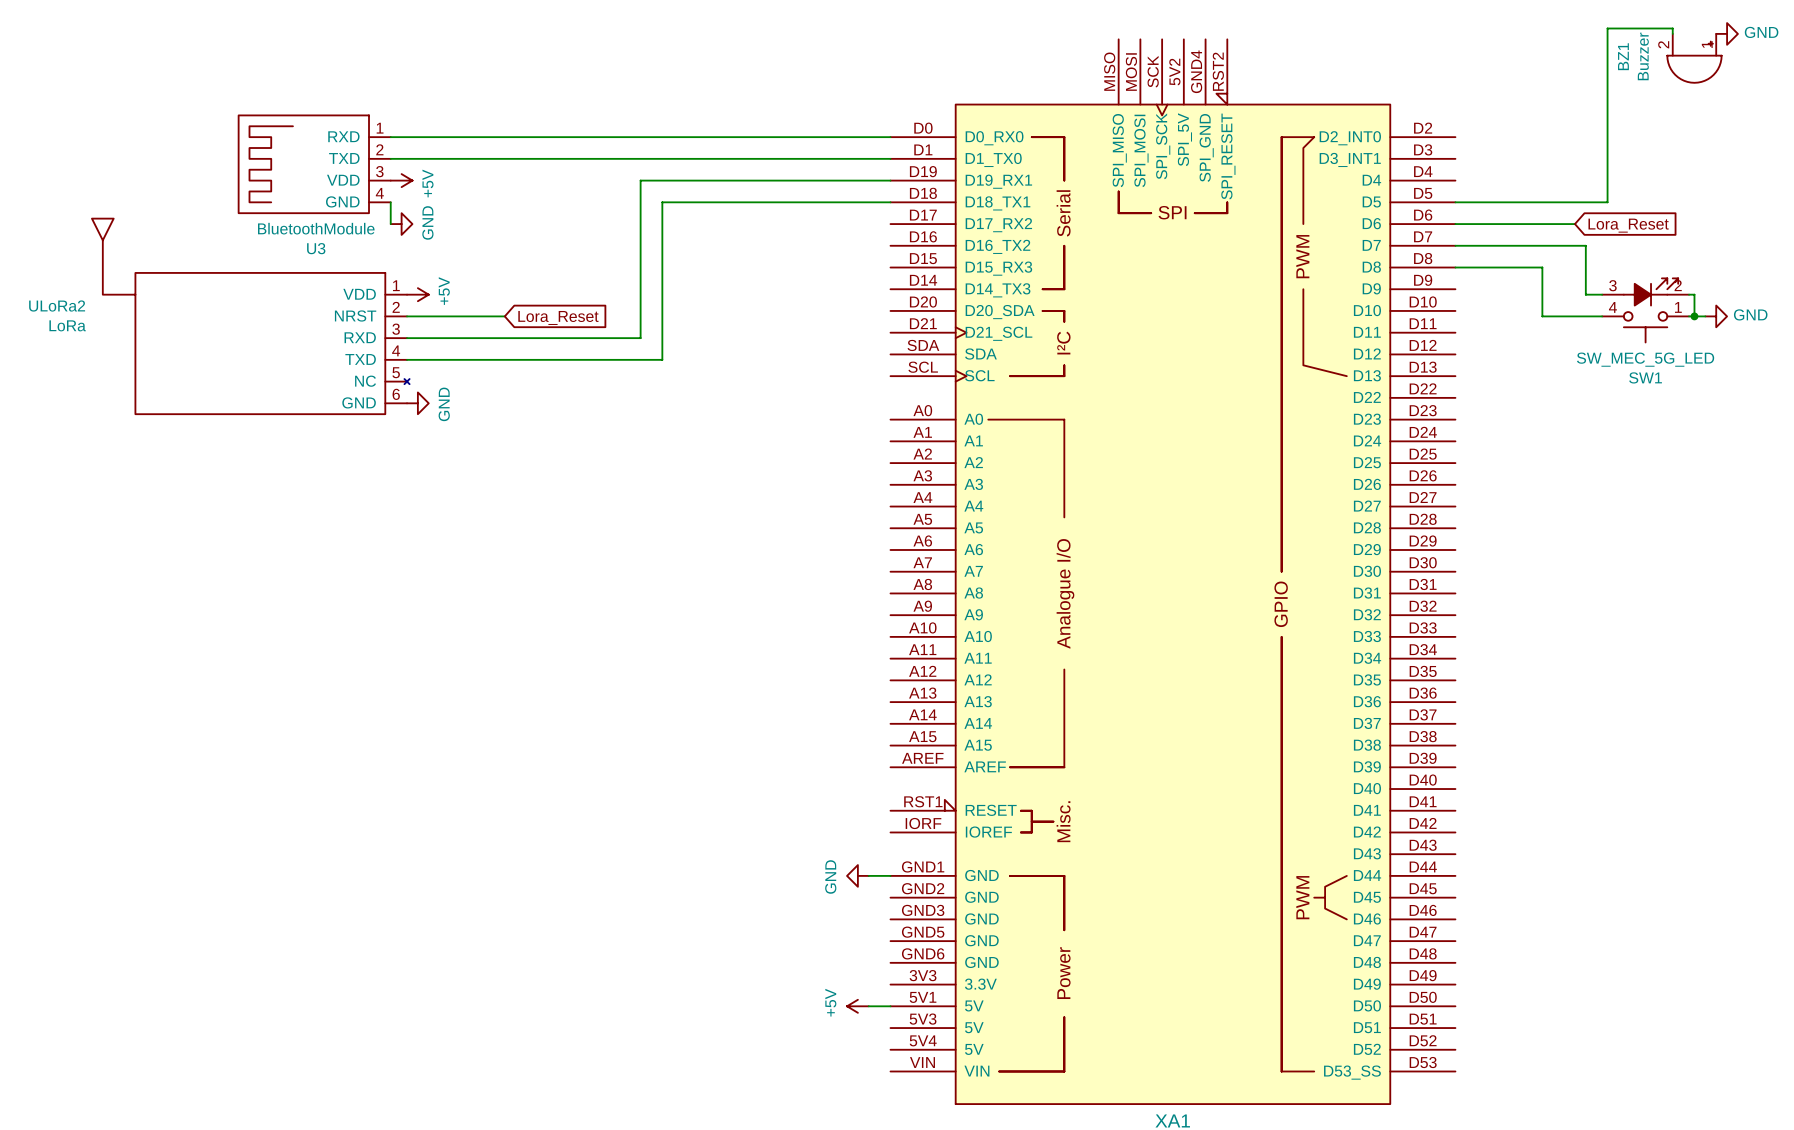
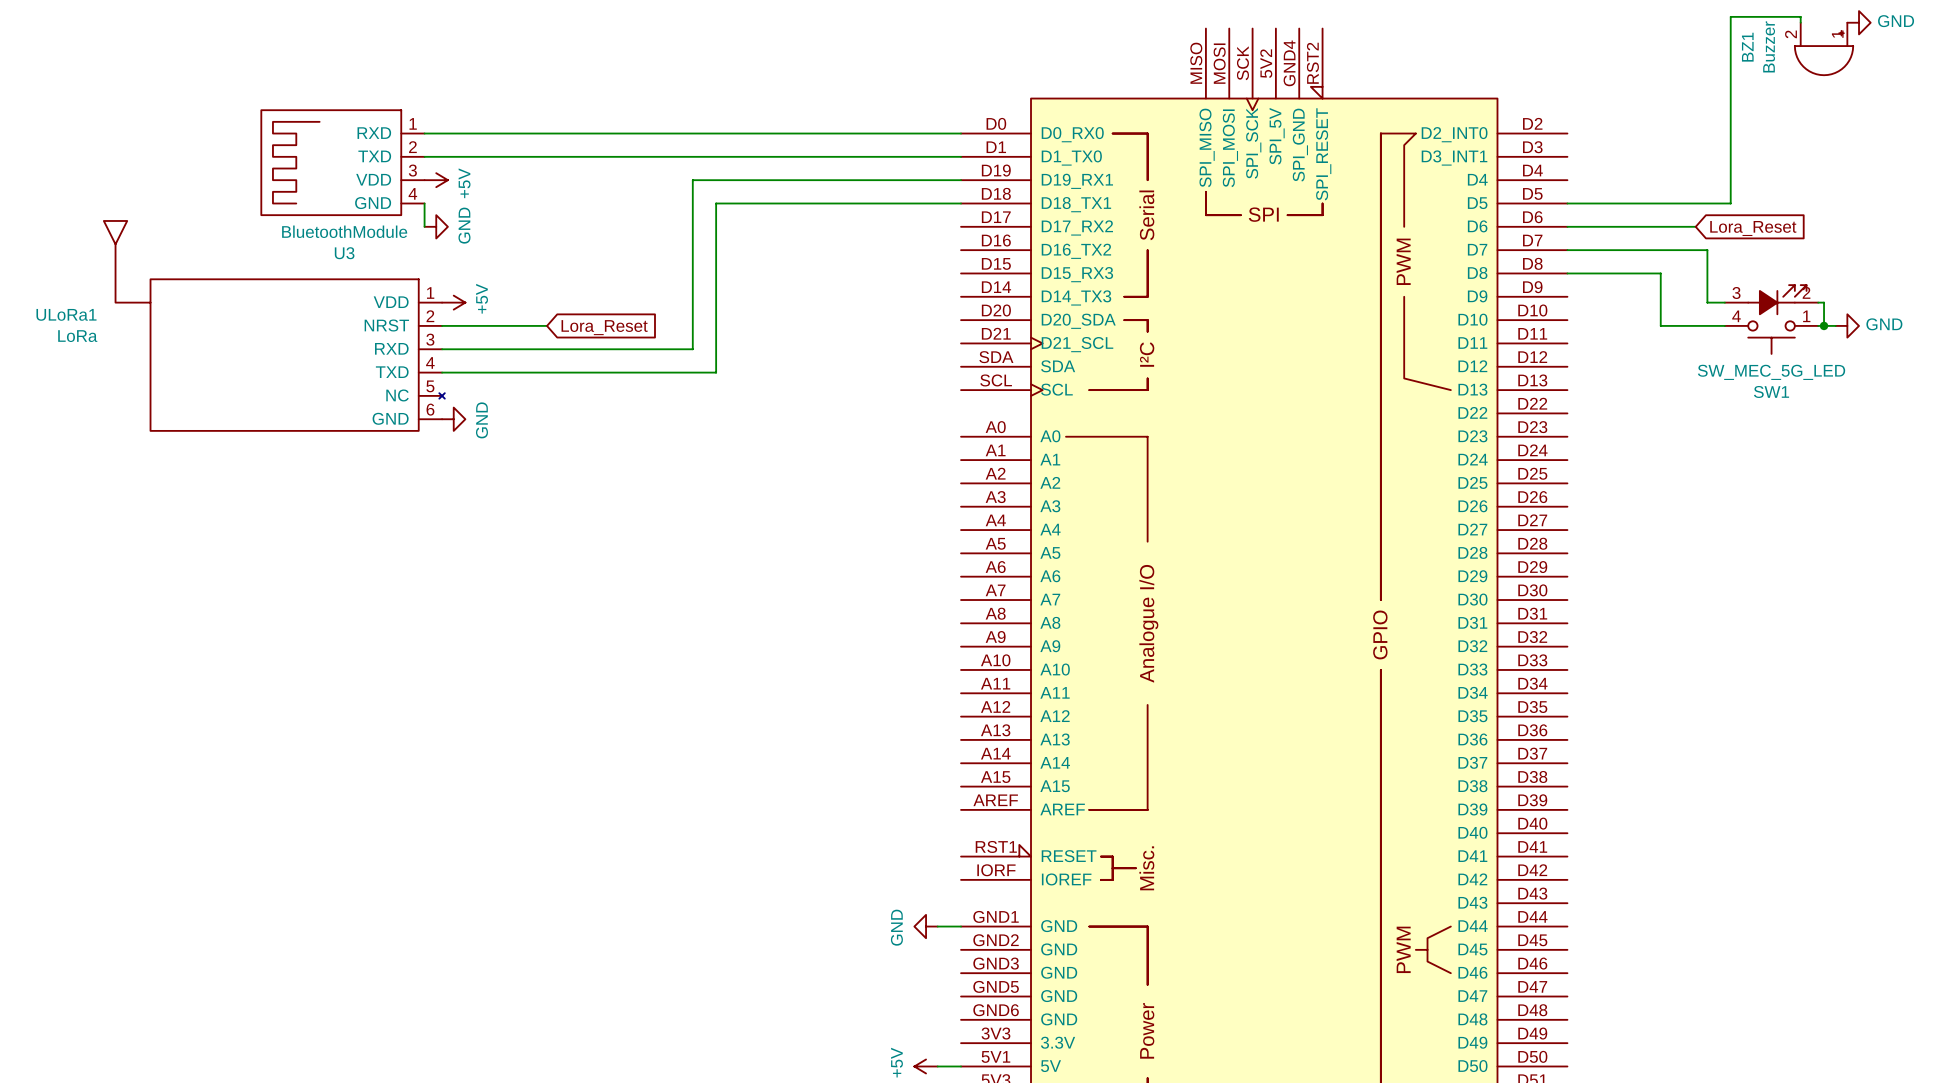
ULoRa2 name: ULoRa2 (57, 306) -> ULoRa1 (66, 314)

